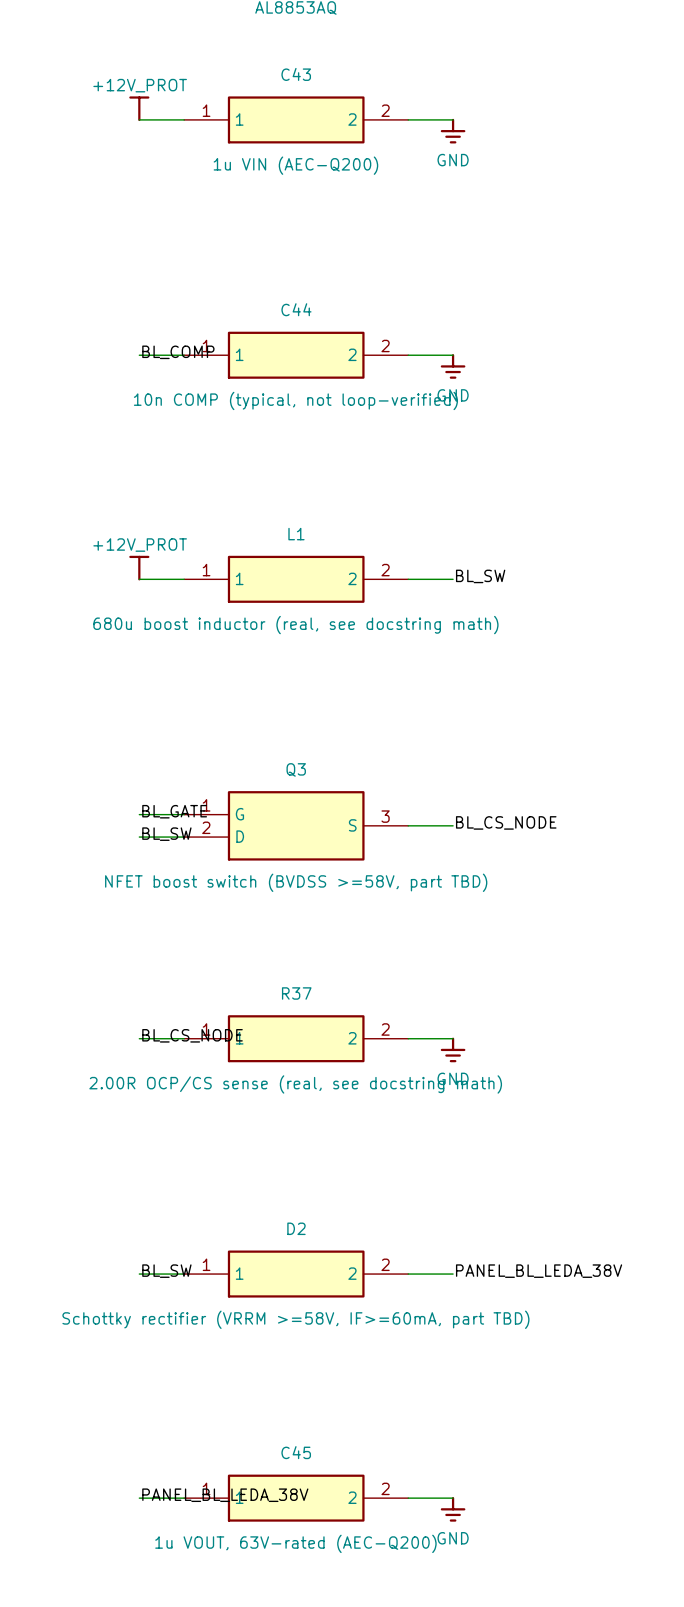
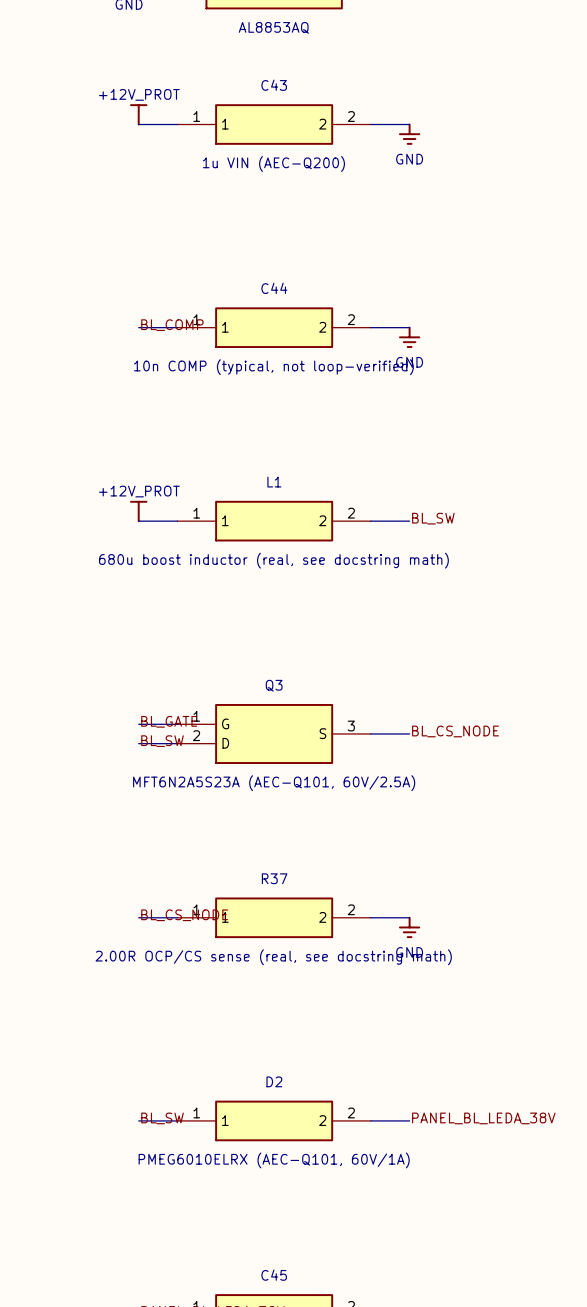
Q3 value: NFET boost switch (BVDSS >=58V, part TBD) (296, 882) -> MFT6N2A5S23A (AEC-Q101, 60V/2.5A) (274, 783)
D2 value: Schottky rectifier (VRRM >=58V, IF>=60mA, part TBD) (295, 1319) -> PMEG6010ELRX (AEC-Q101, 60V/1A) (274, 1160)

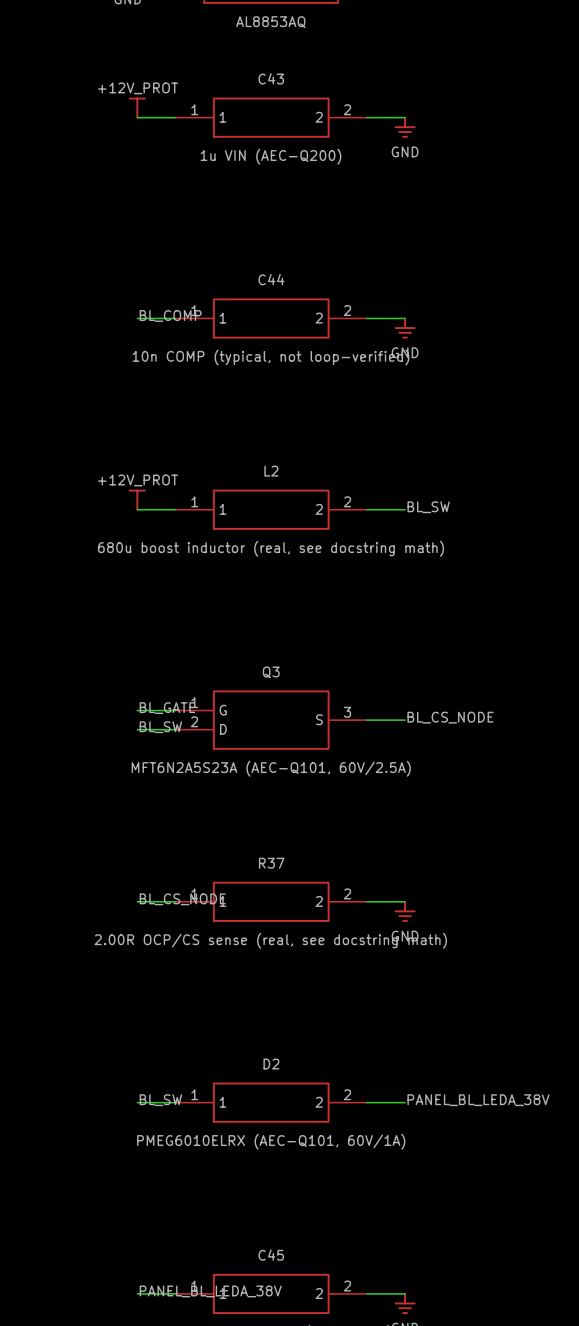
L1 name: L1 (274, 482) -> L2 (271, 471)

